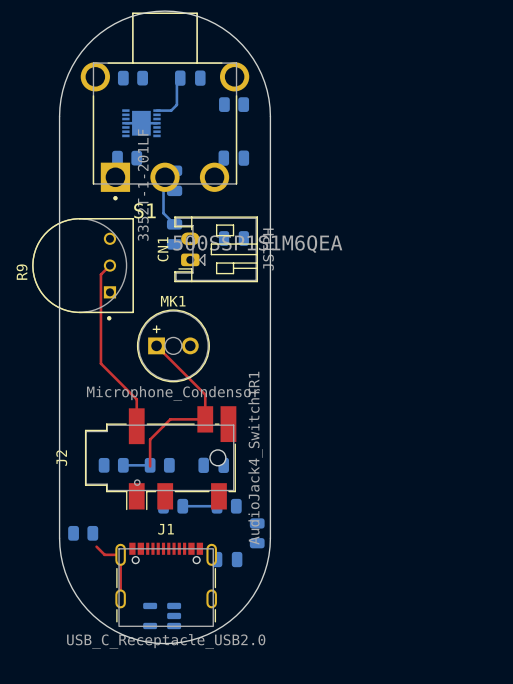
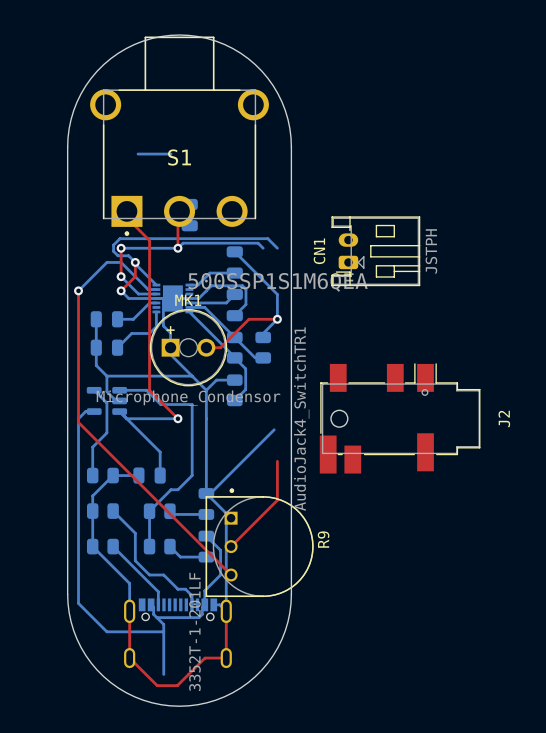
part: (132, 78) -> none
bottom track: (180, 78) (176, 81) (176, 104) (171, 110) (156, 110) -> none
part: (190, 78) -> none
part: (234, 104) -> none
part position: (141, 123) -> (172, 298)
part: (127, 158) -> none
part: (233, 158) -> none
bottom track: (174, 170) (163, 181) (163, 213) (174, 224) -> none
top track: none -> (125, 216) (149, 240) (149, 390) (177, 418)
top track: none -> (177, 216) (177, 248)
S1 name position: S1 (144, 210) -> S1 (179, 157)
top track: none -> (121, 248) (121, 276)
bottom track: none -> (121, 248) (177, 248) (183, 243) (258, 243) (263, 248)
via: none -> (121, 248)
via: none -> (177, 248)
bottom track: none -> (277, 248) (267, 238) (120, 238) (113, 245) (113, 251) (118, 255) (128, 255) (156, 285)
bottom track: none -> (234, 251) (277, 294) (277, 319) (263, 333) (263, 337)
top track: none -> (135, 262) (135, 276) (121, 290)
via: none -> (135, 262)
part: none -> (234, 262)
part: (174, 234) -> none
bottom track: none -> (234, 273) (209, 273) (197, 285) (189, 285)
bottom track: none -> (121, 276) (138, 294) (156, 294)
via: none -> (121, 276)
part: (233, 238) -> none
CN1 position: (216, 249) -> (375, 251)
bottom track: none -> (156, 289) (148, 289) (121, 262) (106, 262) (78, 290)
top track: none -> (78, 290) (78, 422) (231, 575)
via: none -> (78, 290)
bottom track: none -> (121, 290) (128, 298) (198, 298) (211, 285) (242, 285) (245, 289) (245, 304) (234, 315)
via: none -> (121, 290)
bottom track: none -> (234, 294) (226, 302) (189, 302)
bottom track: none -> (163, 298) (163, 325) (170, 333) (170, 354) (206, 390)
bottom track: none -> (156, 302) (149, 302) (133, 319) (117, 319)
top track: (109, 265) (100, 274) (100, 363) (136, 399) (136, 426) -> none
part: none -> (234, 305)
bottom track: none -> (189, 307) (204, 307) (255, 357) (263, 357)
R9 rotation: 0° (83, 269) -> 180° (259, 542)
R9 position: (83, 269) -> (259, 542)
bottom track: none -> (156, 311) (156, 326) (149, 333) (131, 333) (117, 347)
bottom track: none -> (189, 311) (245, 368) (245, 389) (234, 400)
bottom track: none -> (96, 319) (96, 365) (106, 376)
part: none -> (106, 319)
top track: none -> (277, 319) (248, 319) (220, 347) (206, 347)
via: none -> (277, 319)
part: none -> (106, 347)
part: none -> (234, 347)
part: none -> (263, 347)
bottom track: none -> (106, 376) (106, 391) (116, 400) (119, 400)
bottom track: none -> (106, 376) (192, 376)
bottom track: none -> (234, 380) (216, 380) (206, 390)
bottom track: none -> (94, 390) (106, 403) (106, 432) (92, 447) (92, 475)
bottom track: none -> (119, 390) (146, 390) (160, 404) (192, 404) (192, 475) (177, 489) (171, 489) (149, 511) (149, 546)
top track: (156, 345) (205, 394) (205, 419) (170, 419) (150, 439) (150, 466) -> none
MK1 position: (173, 345) -> (188, 347)
bottom track: none -> (206, 390) (206, 493)
part: none -> (234, 390)
part: none -> (106, 400)
bottom track: none -> (94, 411) (85, 411) (78, 418) (78, 603) (106, 631) (163, 631)
bottom track: none -> (119, 411) (160, 452) (160, 475)
bottom track: none -> (126, 418) (177, 418)
via: none -> (177, 418)
bottom track: none -> (274, 429) (210, 493) (206, 493)
top track: none -> (277, 461) (277, 500) (231, 546)
part: none -> (102, 475)
bottom track: none -> (138, 475) (113, 475) (92, 495) (92, 546) (129, 583) (129, 611)
part: none -> (149, 475)
bottom track: none -> (206, 493) (226, 513) (226, 611) (219, 604) (213, 604)
part: none -> (206, 503)
J2 rotation: 0° (160, 458) -> 180° (400, 418)
J2 position: (160, 458) -> (400, 418)
part: none -> (102, 511)
bottom track: none -> (113, 511) (135, 533) (135, 560) (149, 575) (163, 575) (177, 589) (185, 589) (191, 595) (191, 604)
bottom track: none -> (169, 511) (173, 514) (206, 514)
part: (113, 465) -> none
bottom track: (123, 465) (150, 465) -> none
part position: (159, 465) -> (159, 511)
part: (213, 465) -> none
bottom track: none -> (206, 536) (220, 550) (220, 575) (204, 590) (202, 614) (199, 617) (156, 617)
part: none -> (102, 546)
bottom track: none -> (113, 546) (158, 591) (158, 604)
part: none -> (159, 546)
bottom track: none -> (169, 546) (180, 557) (206, 557)
part: none -> (206, 546)
part: (173, 506) -> none
bottom track: (182, 506) (217, 506) -> none
part: (226, 506) -> none
part: (83, 533) -> none
part: (257, 533) -> none
top track: (96, 546) (104, 554) (120, 554) (120, 598) -> none
bottom track: none -> (151, 604) (153, 607) (153, 614) (163, 624) (163, 674)
top track: none -> (129, 611) (129, 658) (157, 685) (177, 685) (204, 658) (226, 658) (226, 611)
part: (227, 559) -> none
J1 side: top (166, 584) -> bottom (177, 633)
part: (162, 615) -> none

